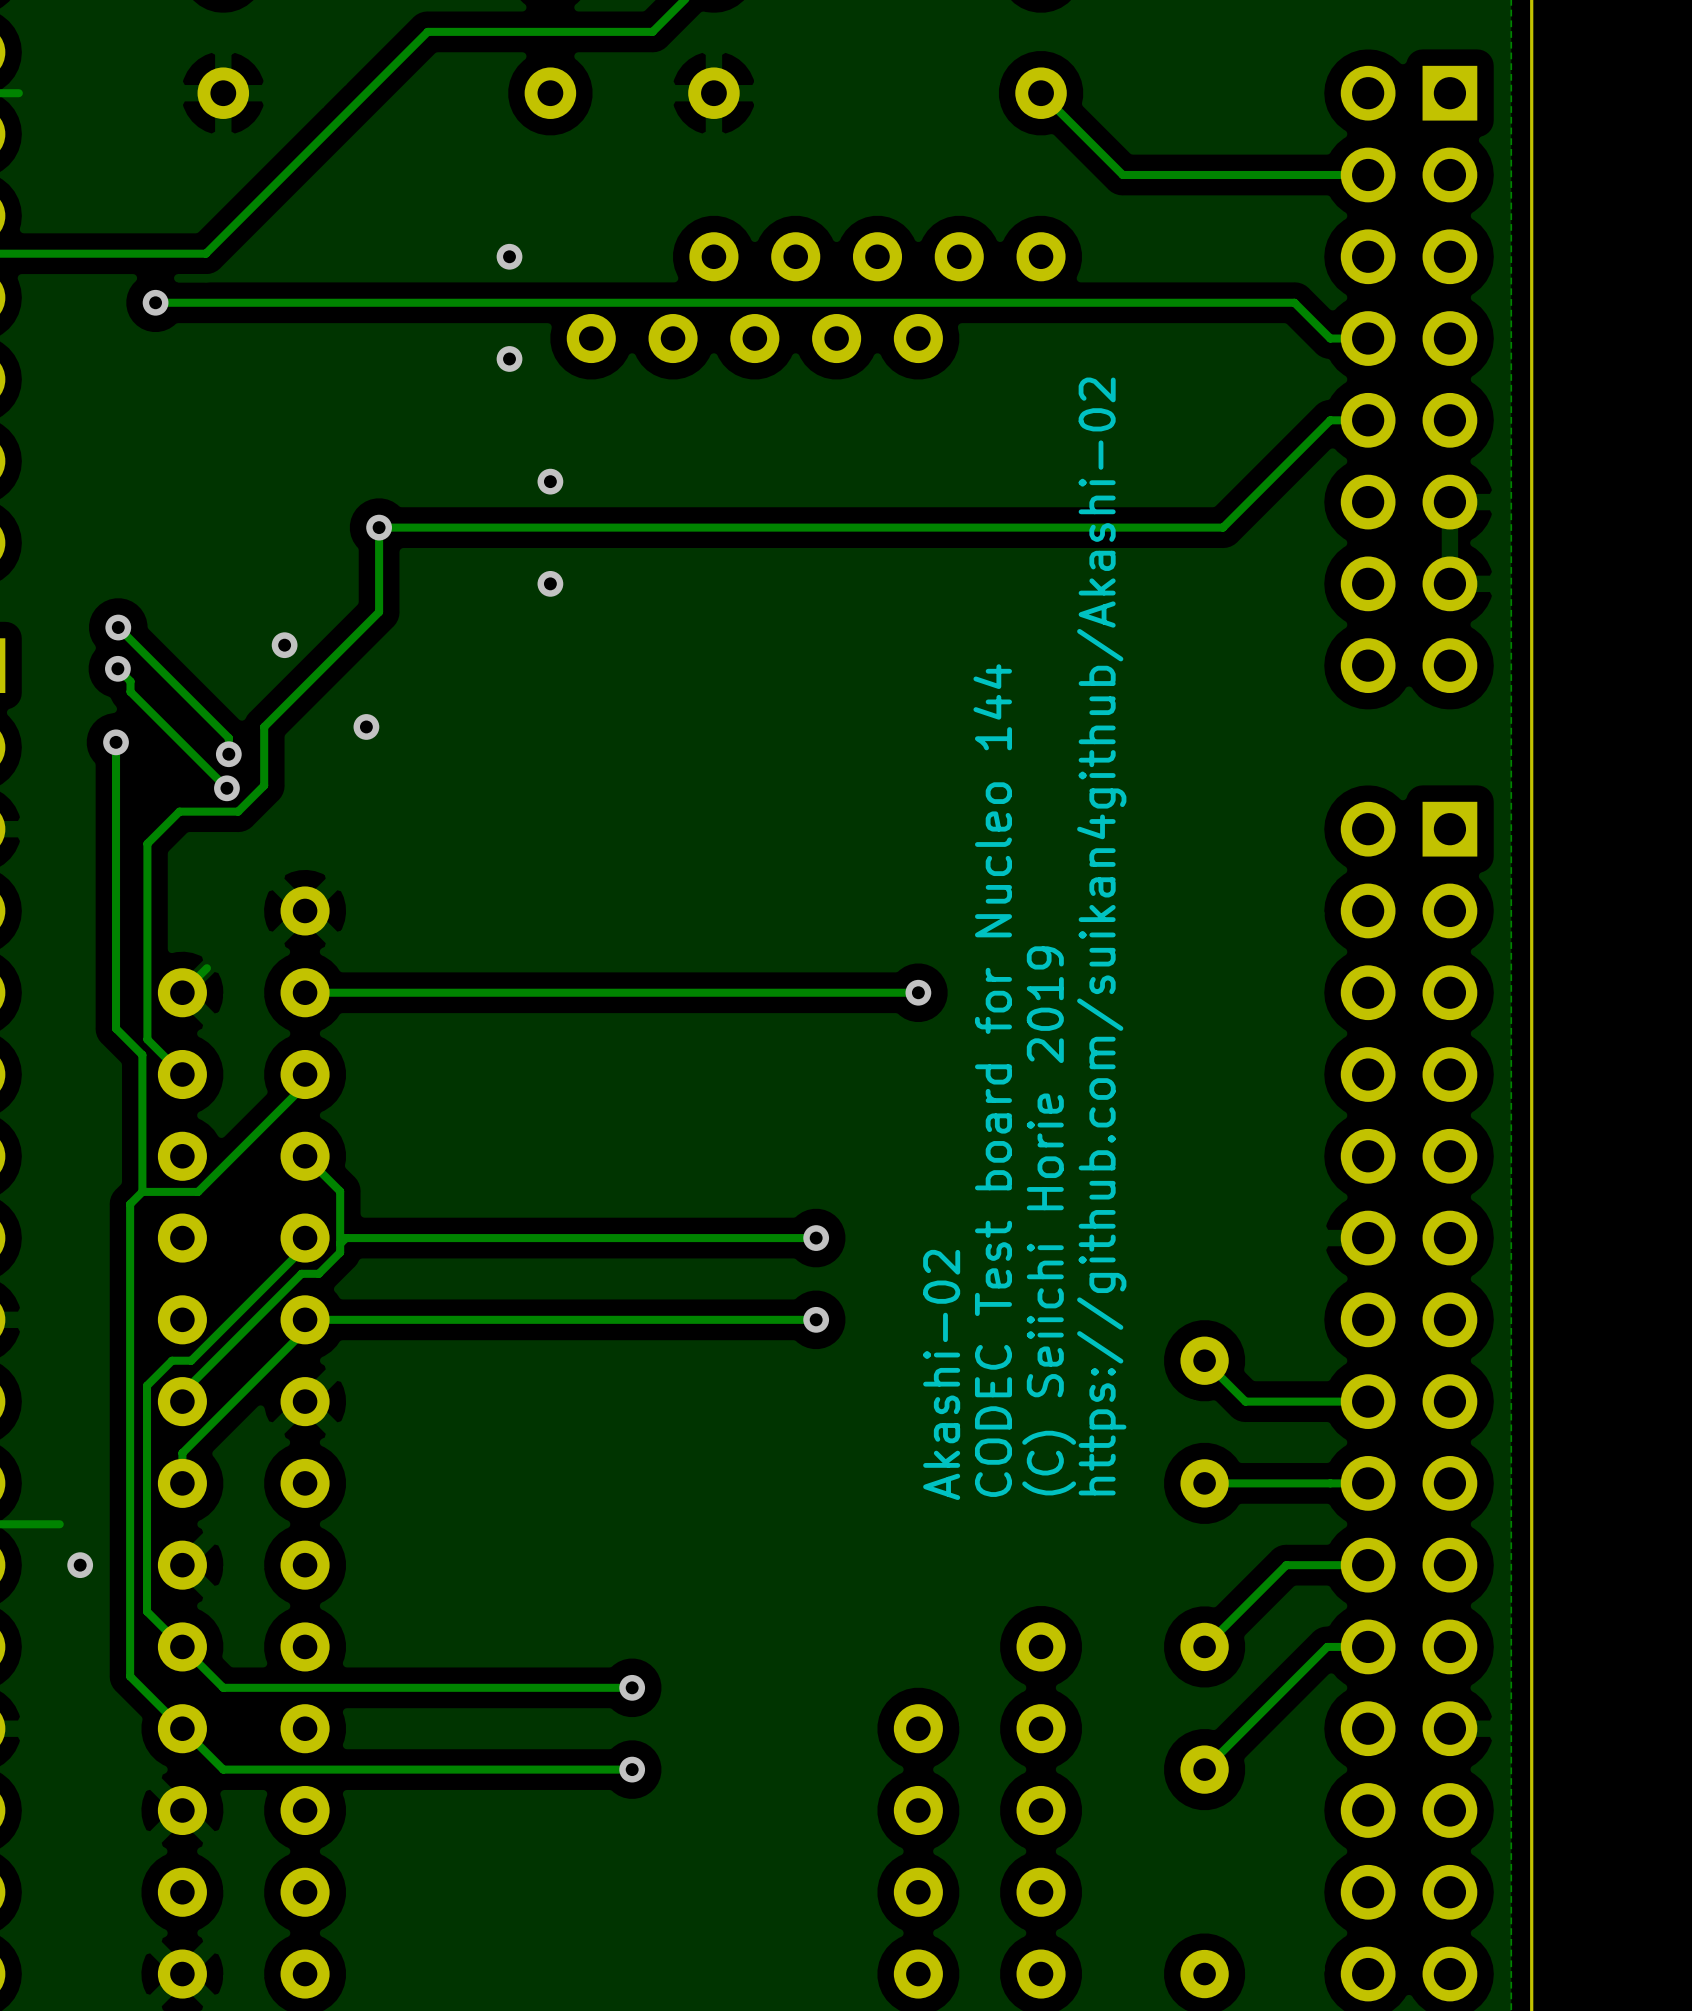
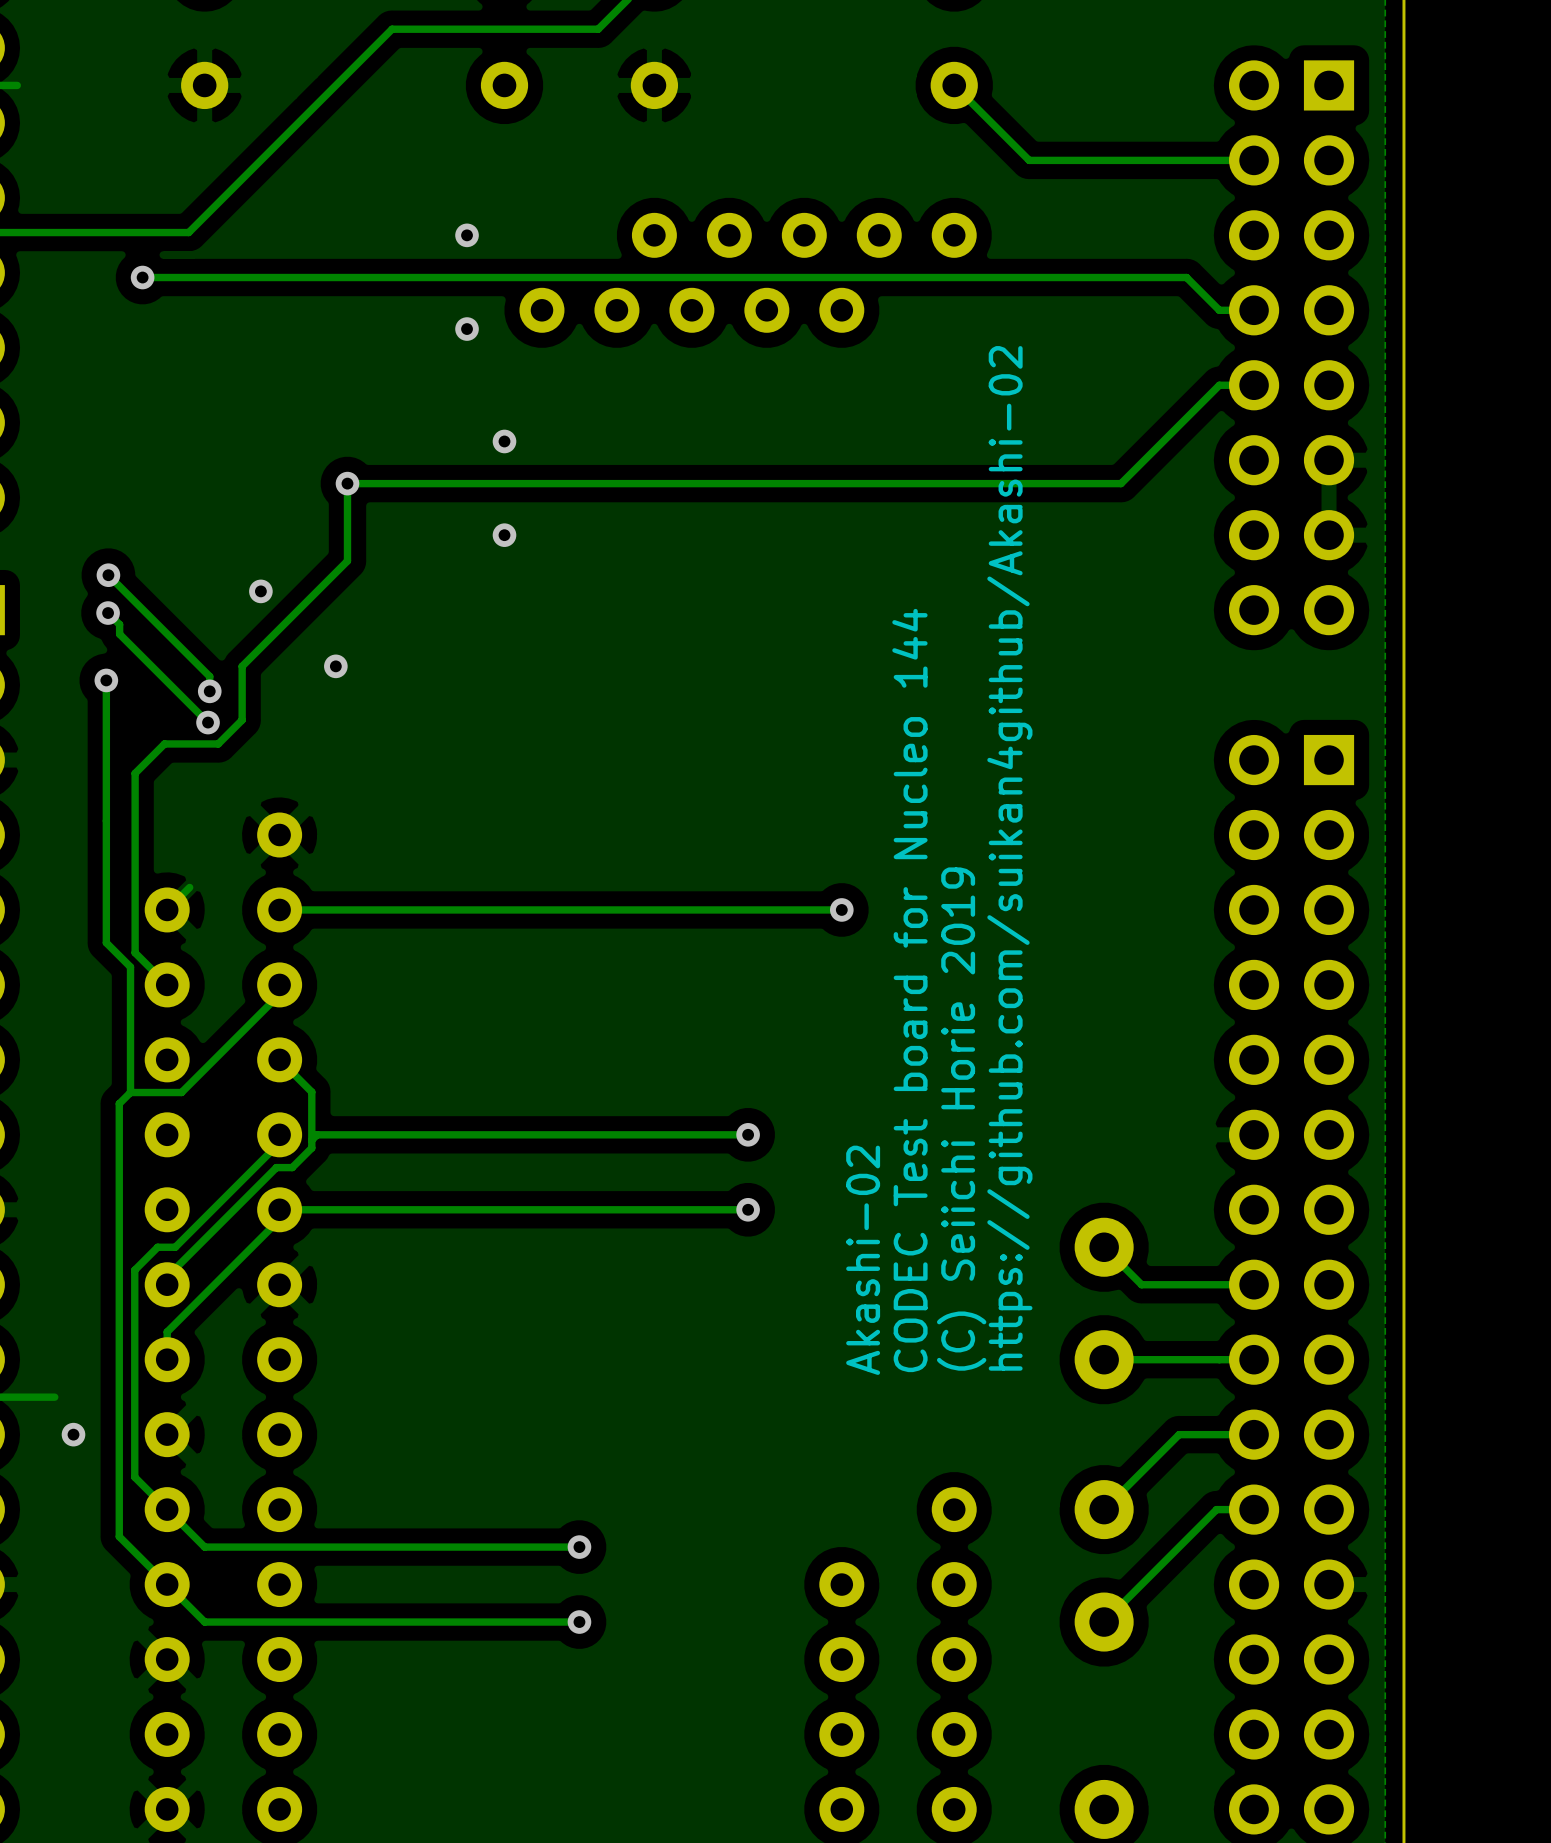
part footprint: [1180, 1336, 1229, 1385] -> [1074, 1217, 1134, 1277]
part footprint: [1180, 1459, 1229, 1508] -> [1074, 1330, 1134, 1390]
part footprint: [1180, 1622, 1229, 1672] -> [1074, 1480, 1134, 1540]
part footprint: [1180, 1745, 1229, 1794] -> [1074, 1592, 1134, 1652]
part footprint: [1180, 1949, 1229, 1999] -> [1074, 1779, 1134, 1839]

